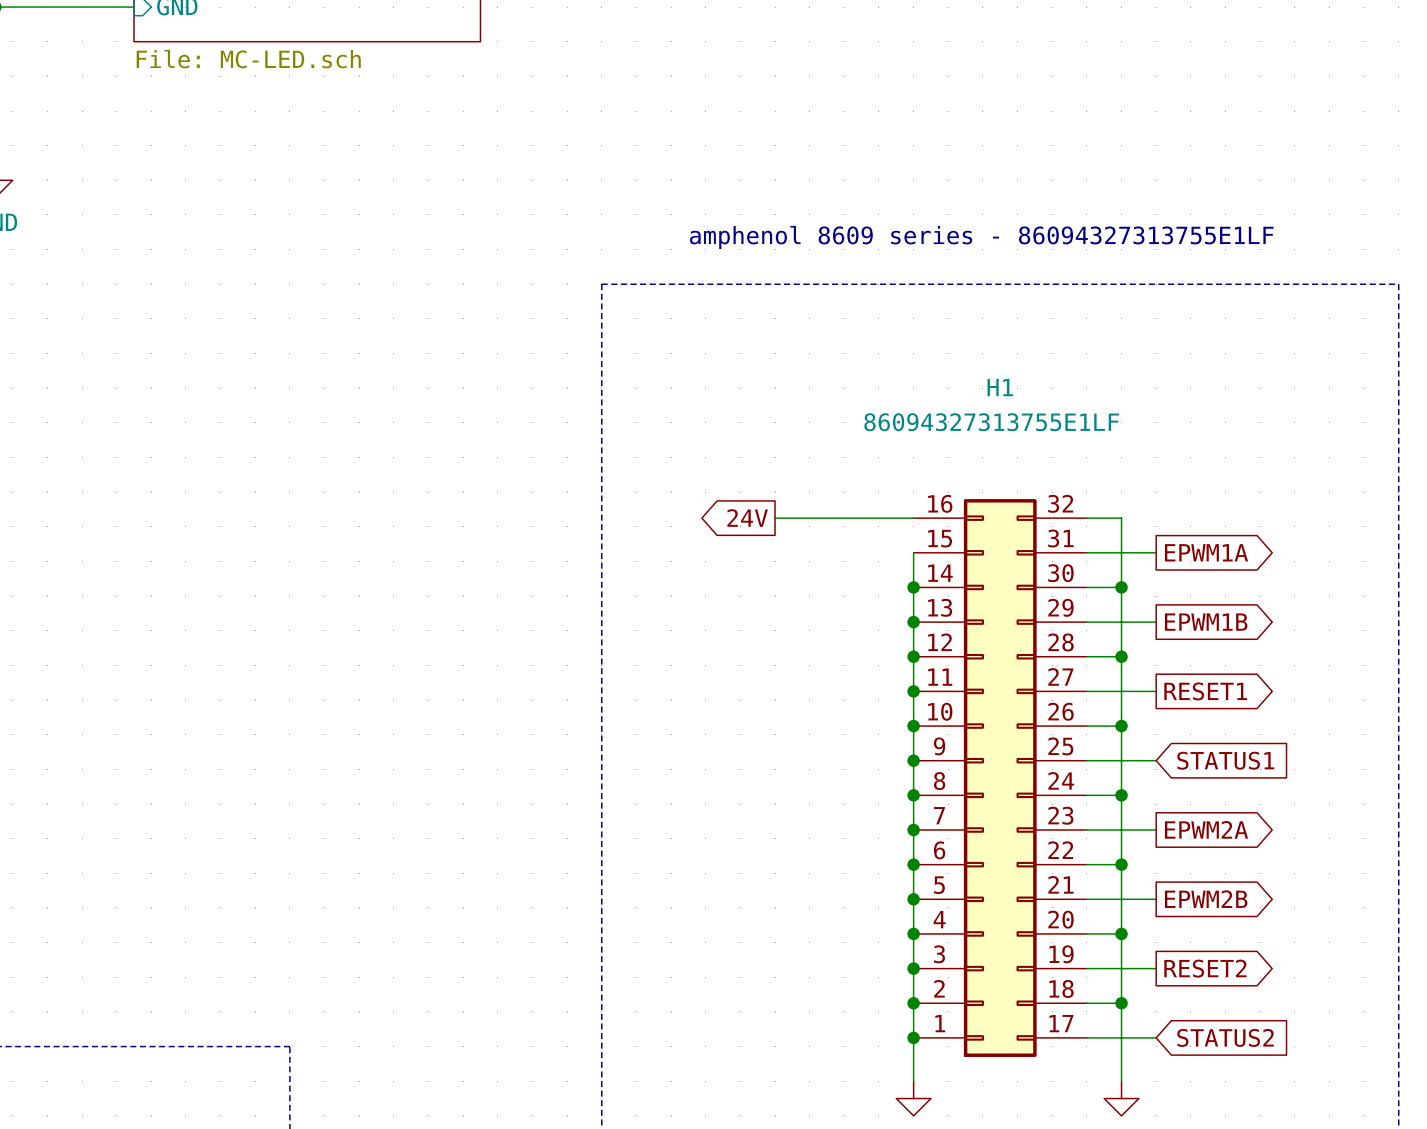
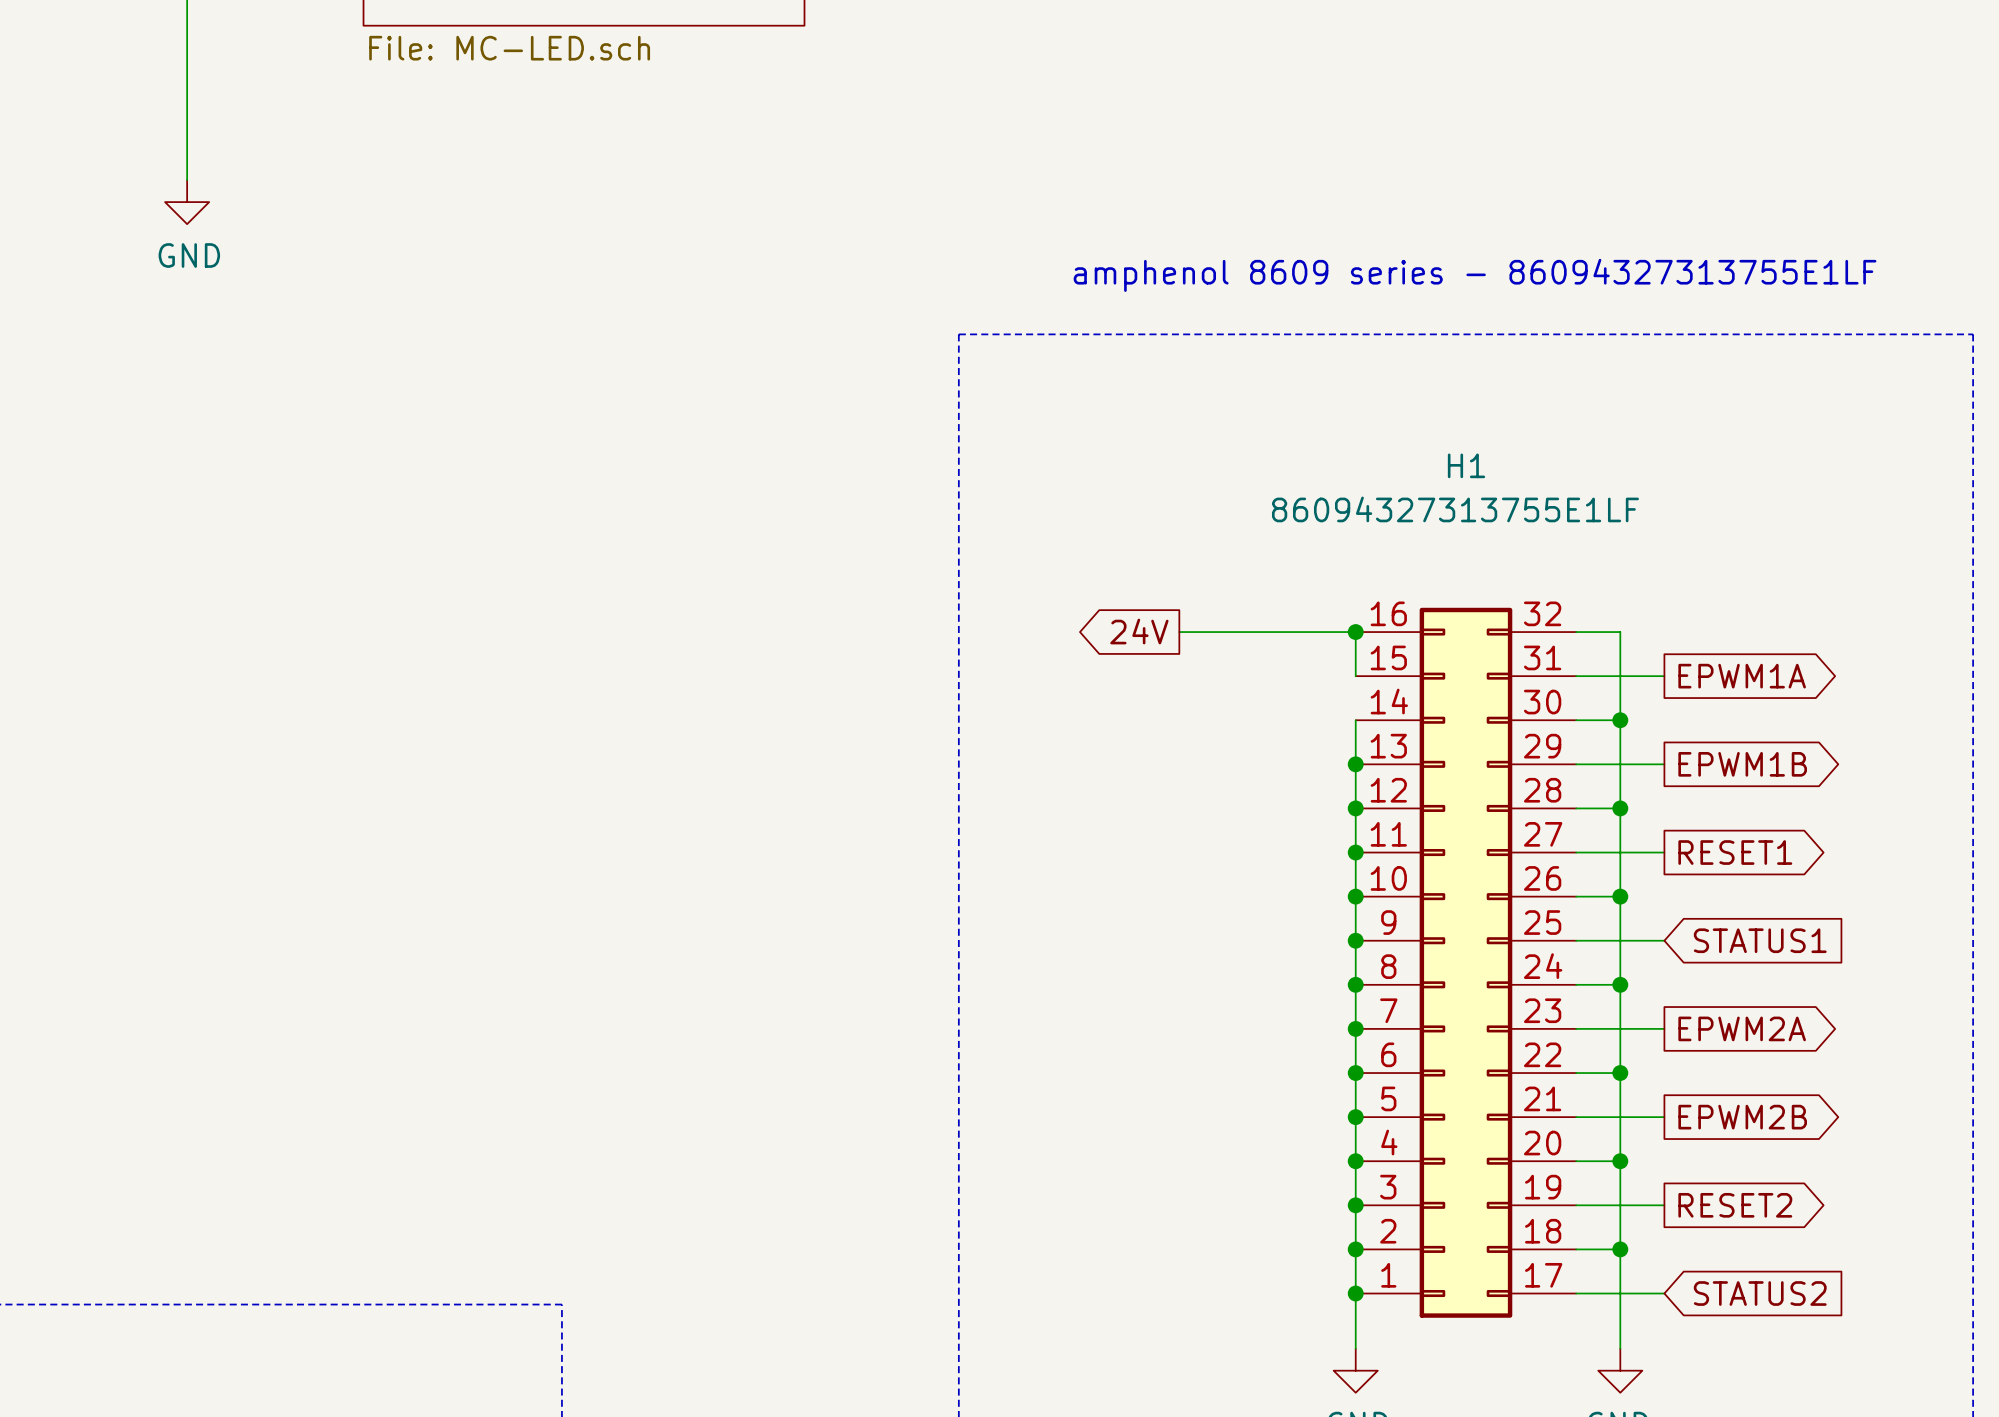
wire: (913, 552) (913, 587) -> (1355, 676) (1355, 632)
junction position: (913, 587) -> (1355, 632)

